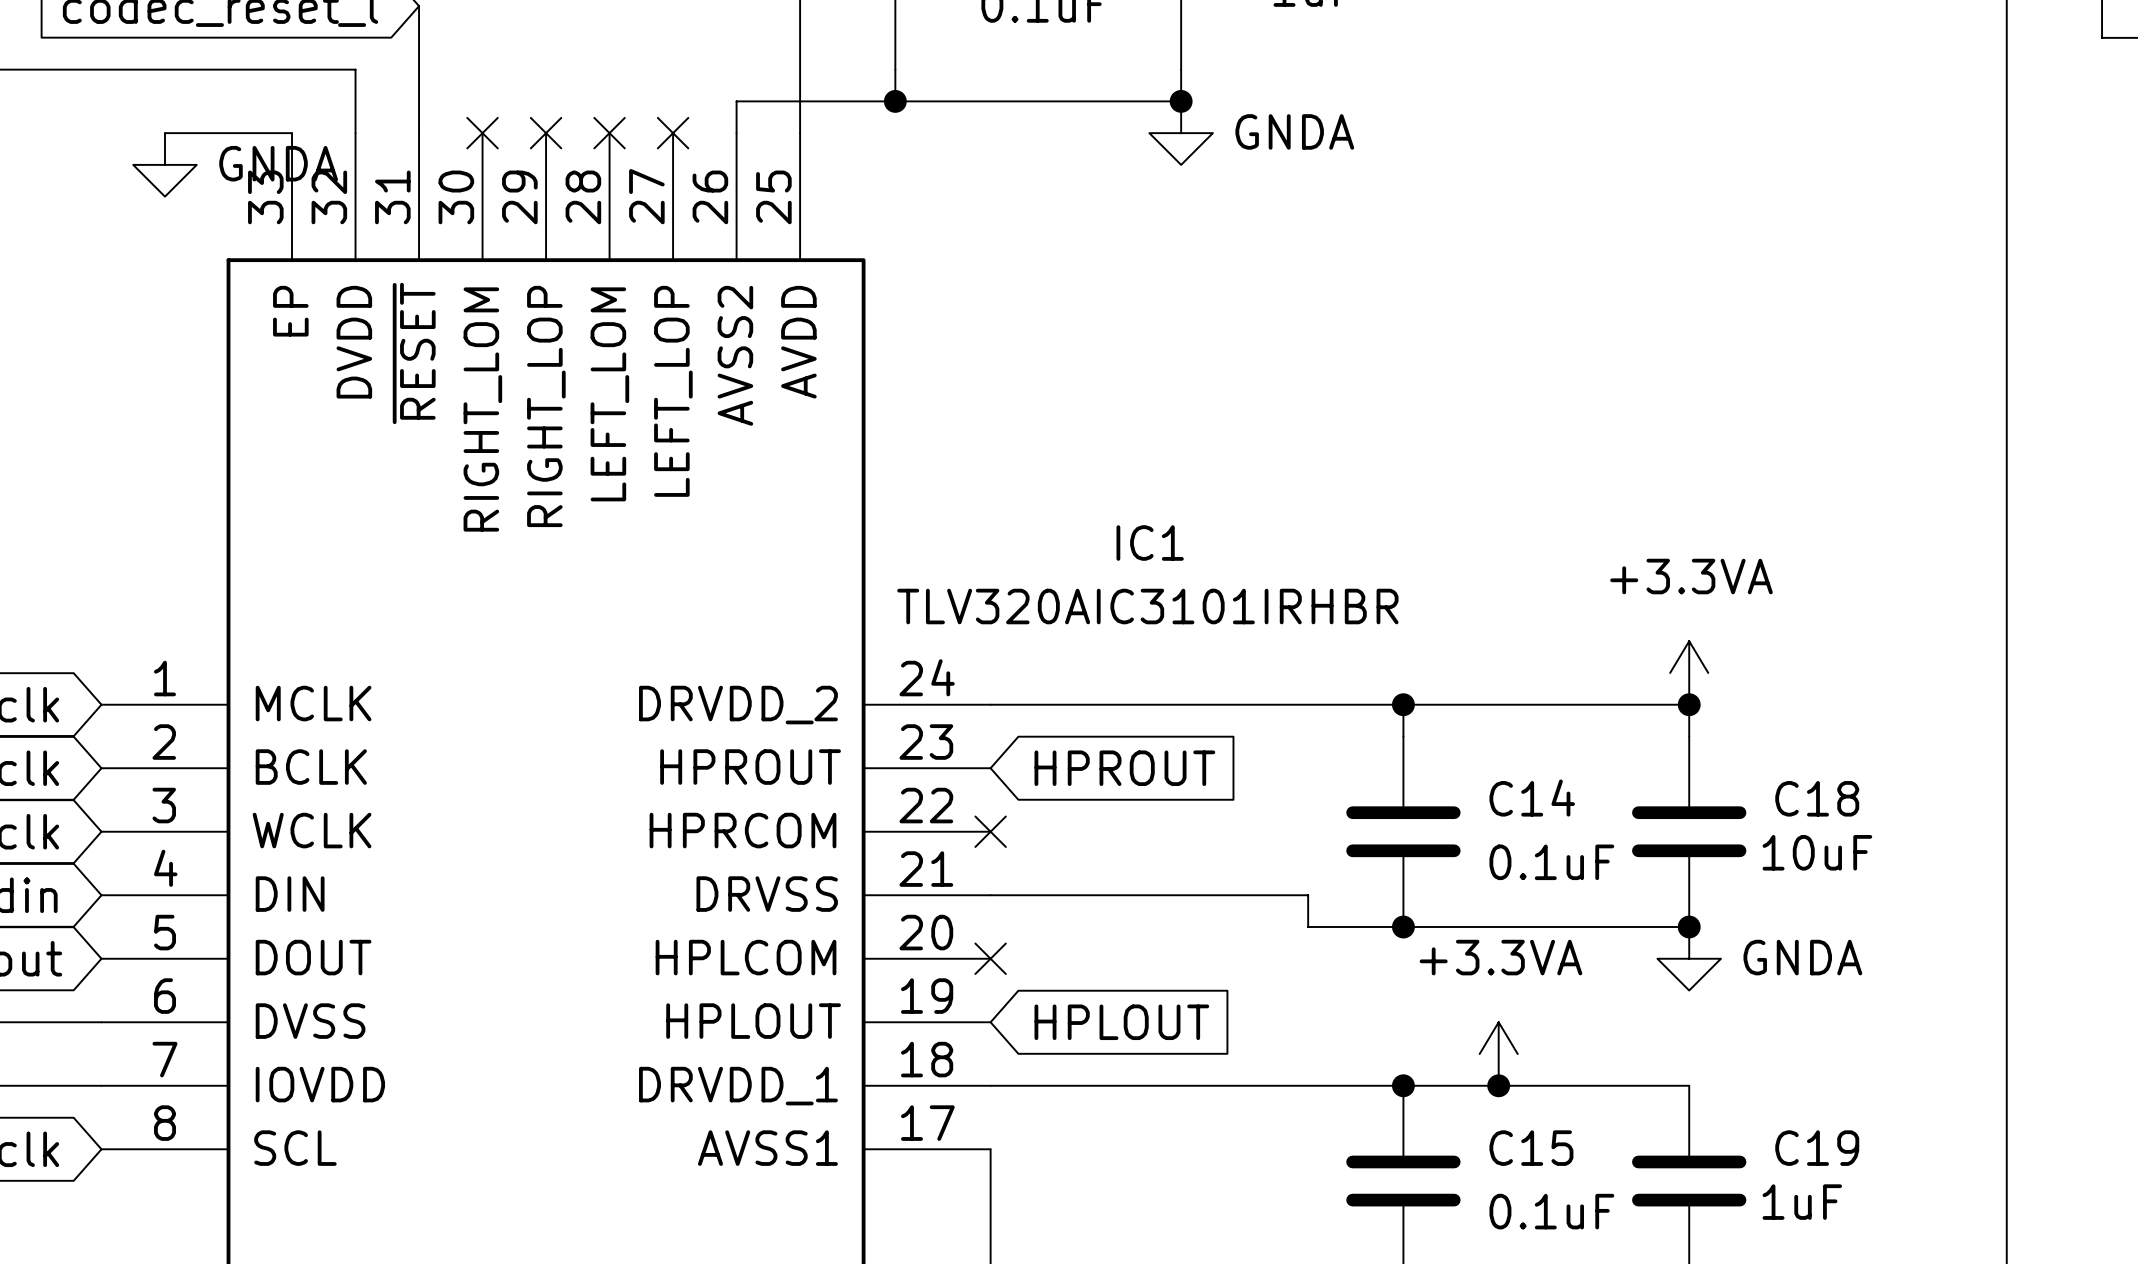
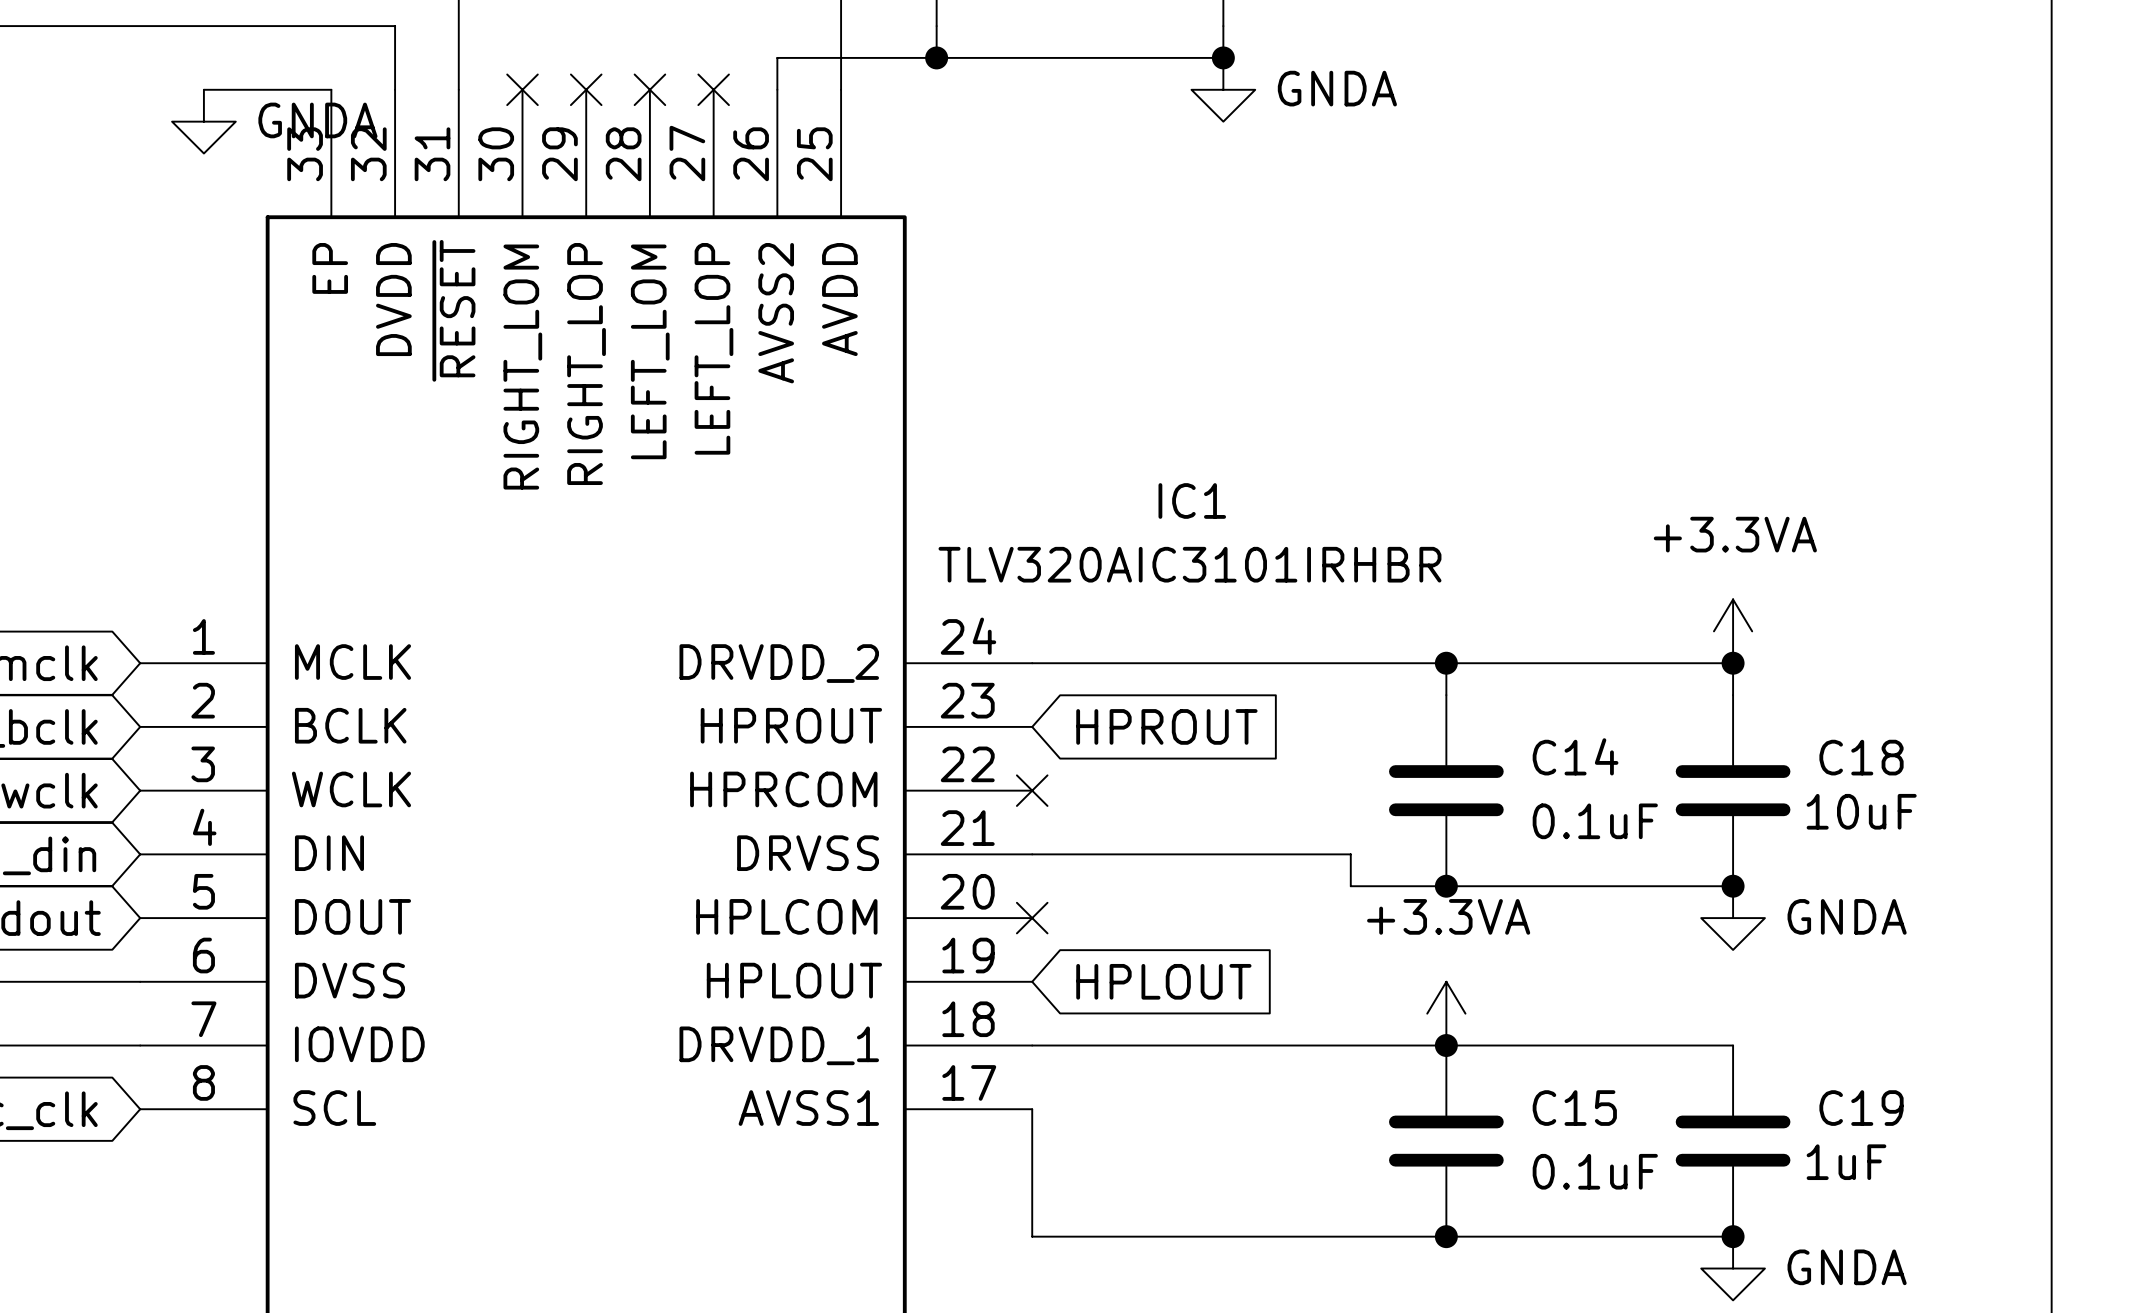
power symbol position: +3.3VA (1498, 1054) -> +3.3VA (1446, 1013)
junction: (1498, 1085) -> none

